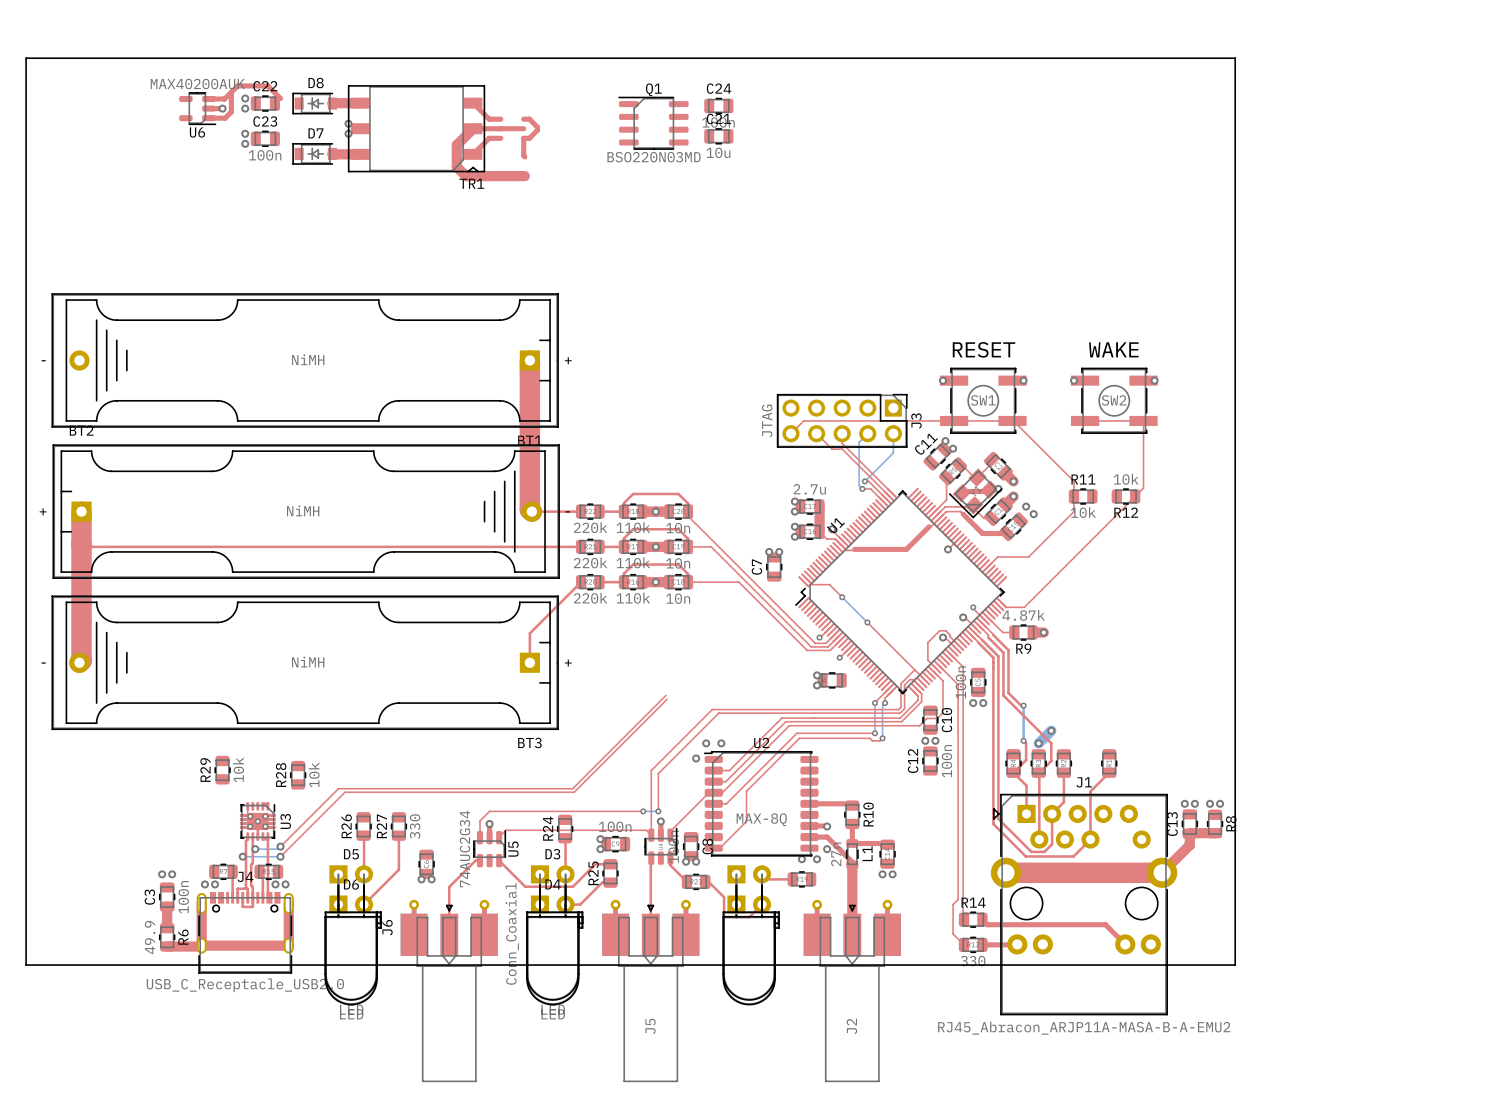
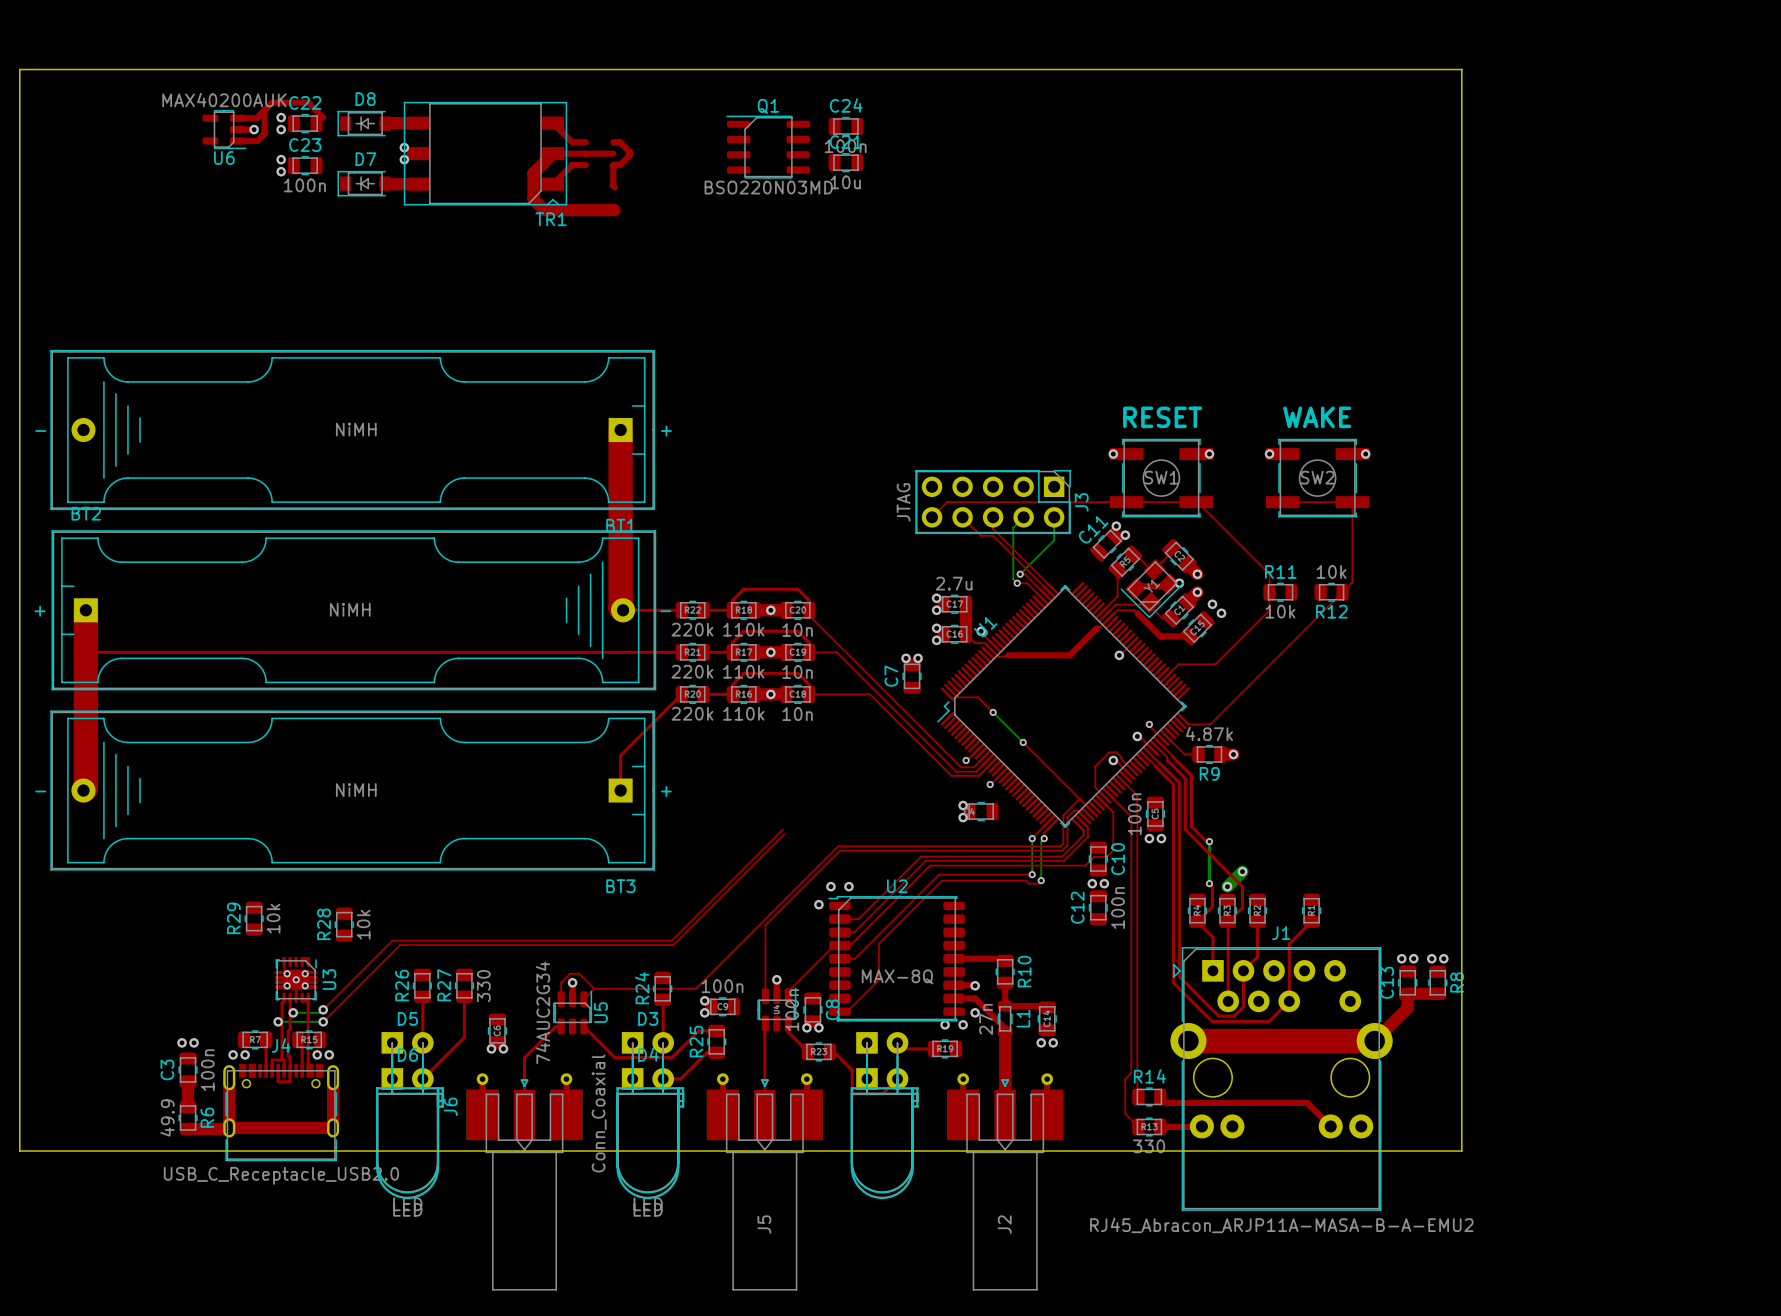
top track: (718, 713) (658, 773) (658, 811) -> (845, 850) (839, 850) (765, 925)
top track: (651, 770) (651, 775) -> (765, 919) (695, 988) (594, 988)
top track: (643, 811) (489, 811) (480, 820) (480, 823) -> (594, 988) (579, 973) (570, 973) (561, 982)
bottom track: (643, 811) (658, 811) -> none
via: (643, 811) -> none
via: (658, 811) -> none
top track: (651, 835) (646, 830) (505, 830) (499, 837) -> (594, 988) (583, 999)

